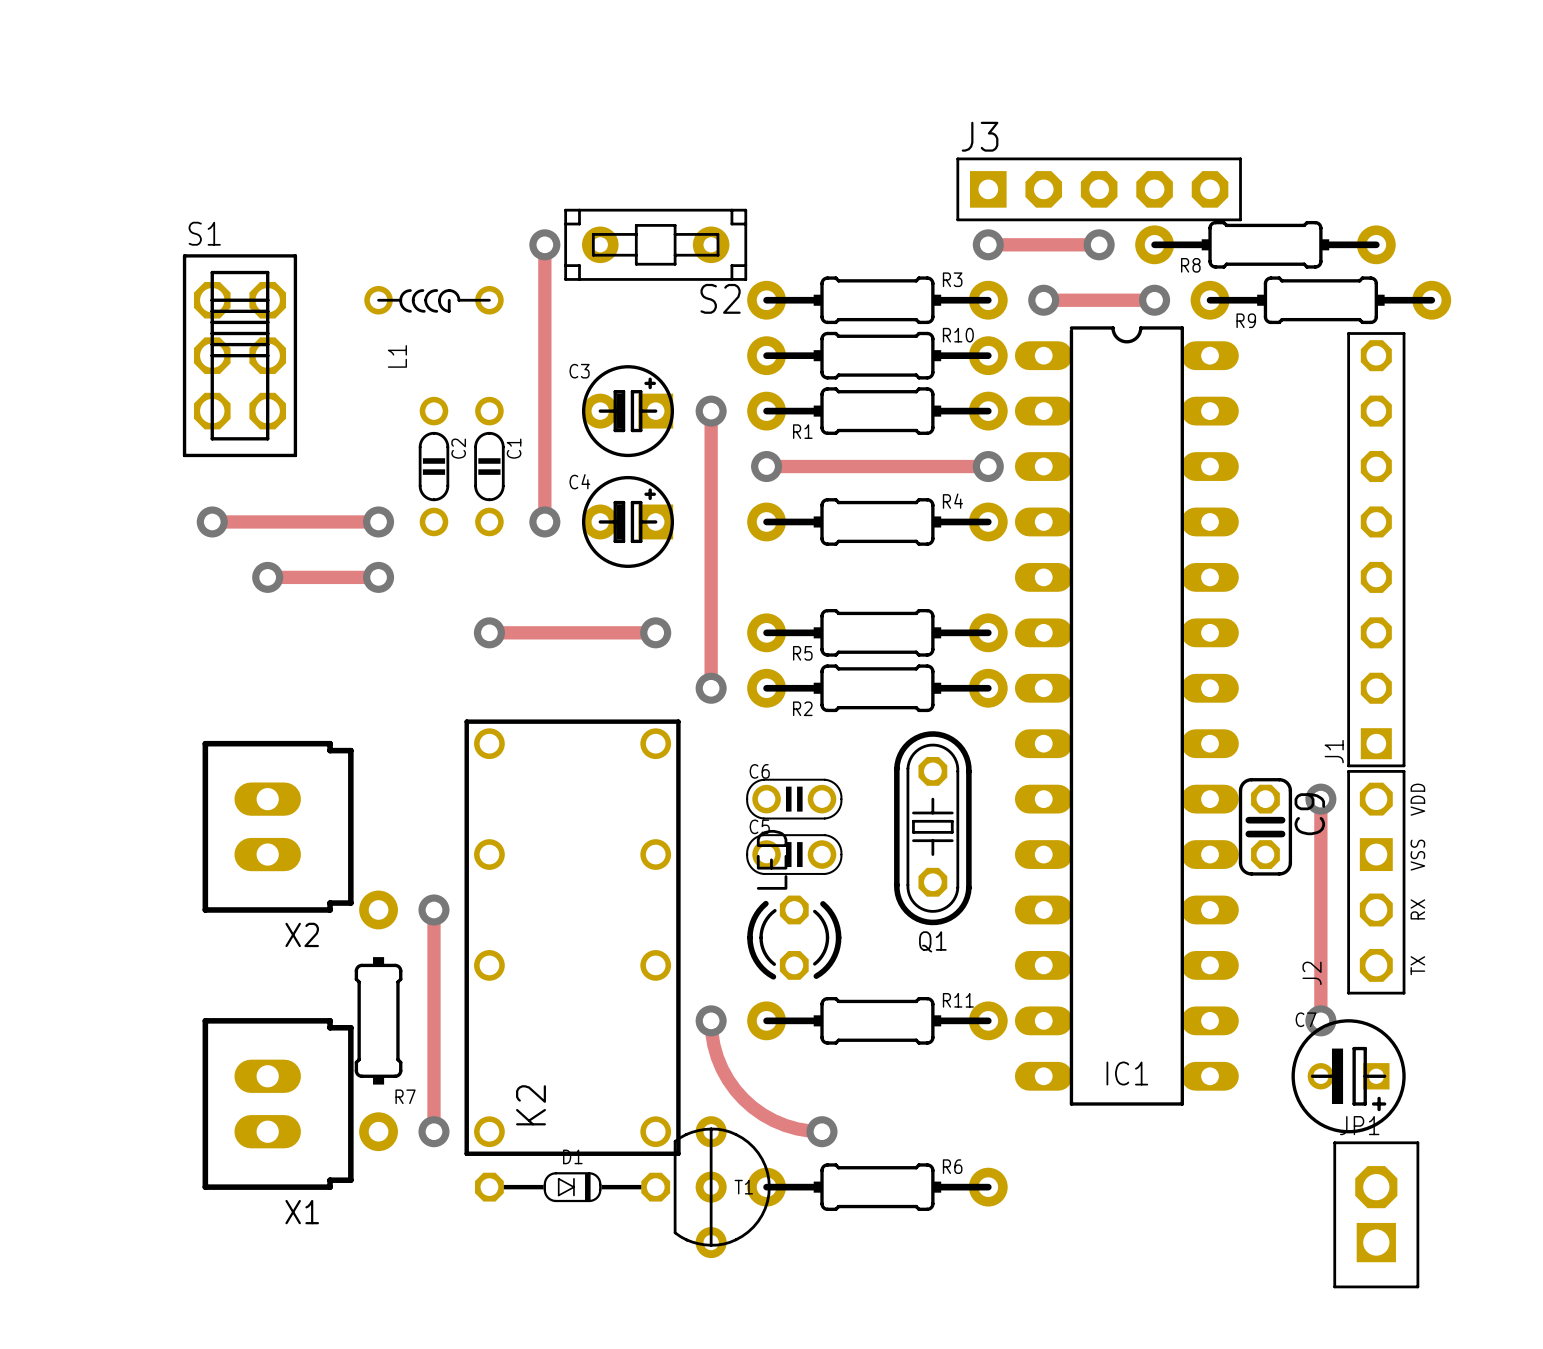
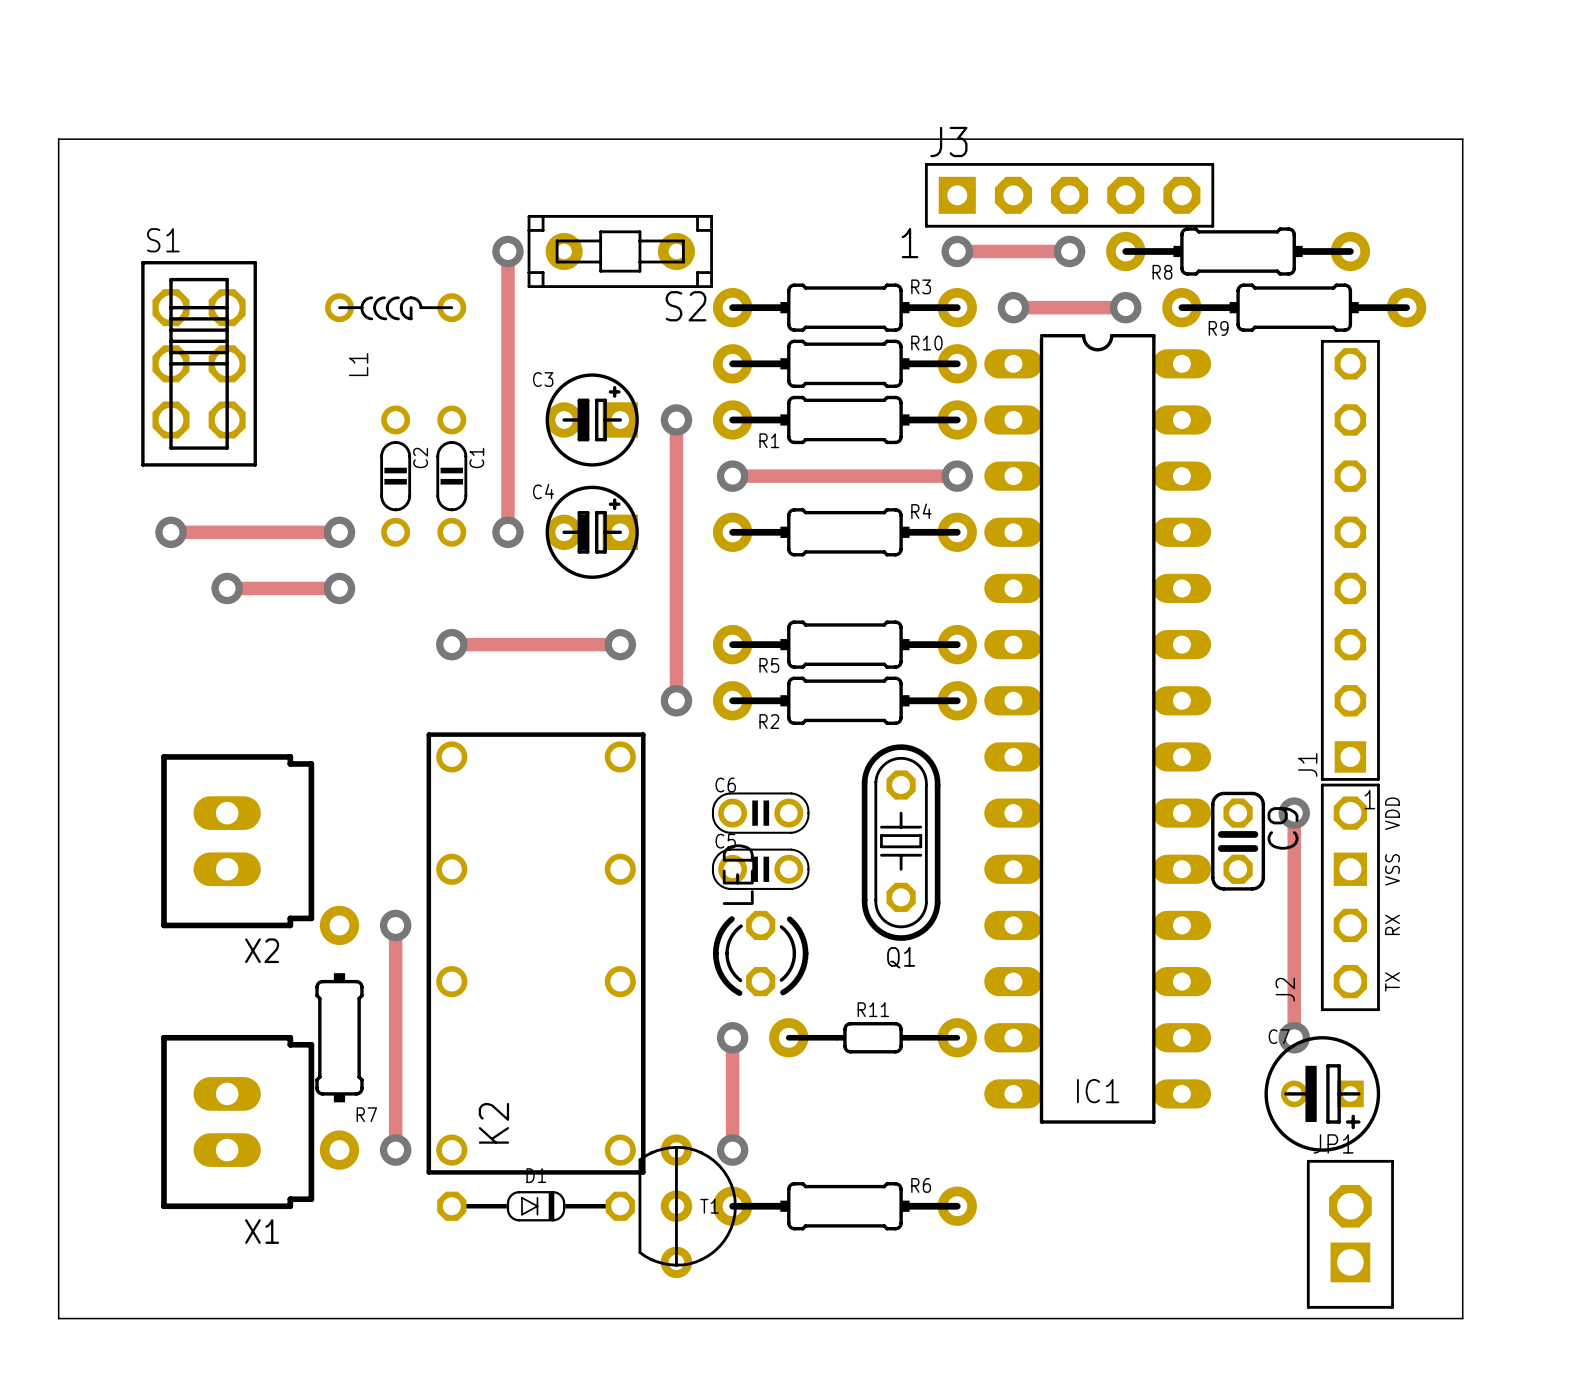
board edge: none -> (58, 139) (1462, 139) (1462, 1318) (58, 1318) (58, 139)
J3 text: none -> 1 (910, 243)
J1 text: none -> 1 (1369, 799)
R11 footprint: [747, 997, 1008, 1045] -> [769, 1018, 977, 1058]
R11 name position: R11 (958, 1000) -> R11 (873, 1009)
track: (711, 1020) (713, 1045) (722, 1068) (743, 1099) (763, 1114) (785, 1125) (822, 1131) -> none
via position: (711, 1020) -> (732, 1037)
track: none -> (732, 1037) (732, 1150)
via position: (822, 1131) -> (732, 1150)

